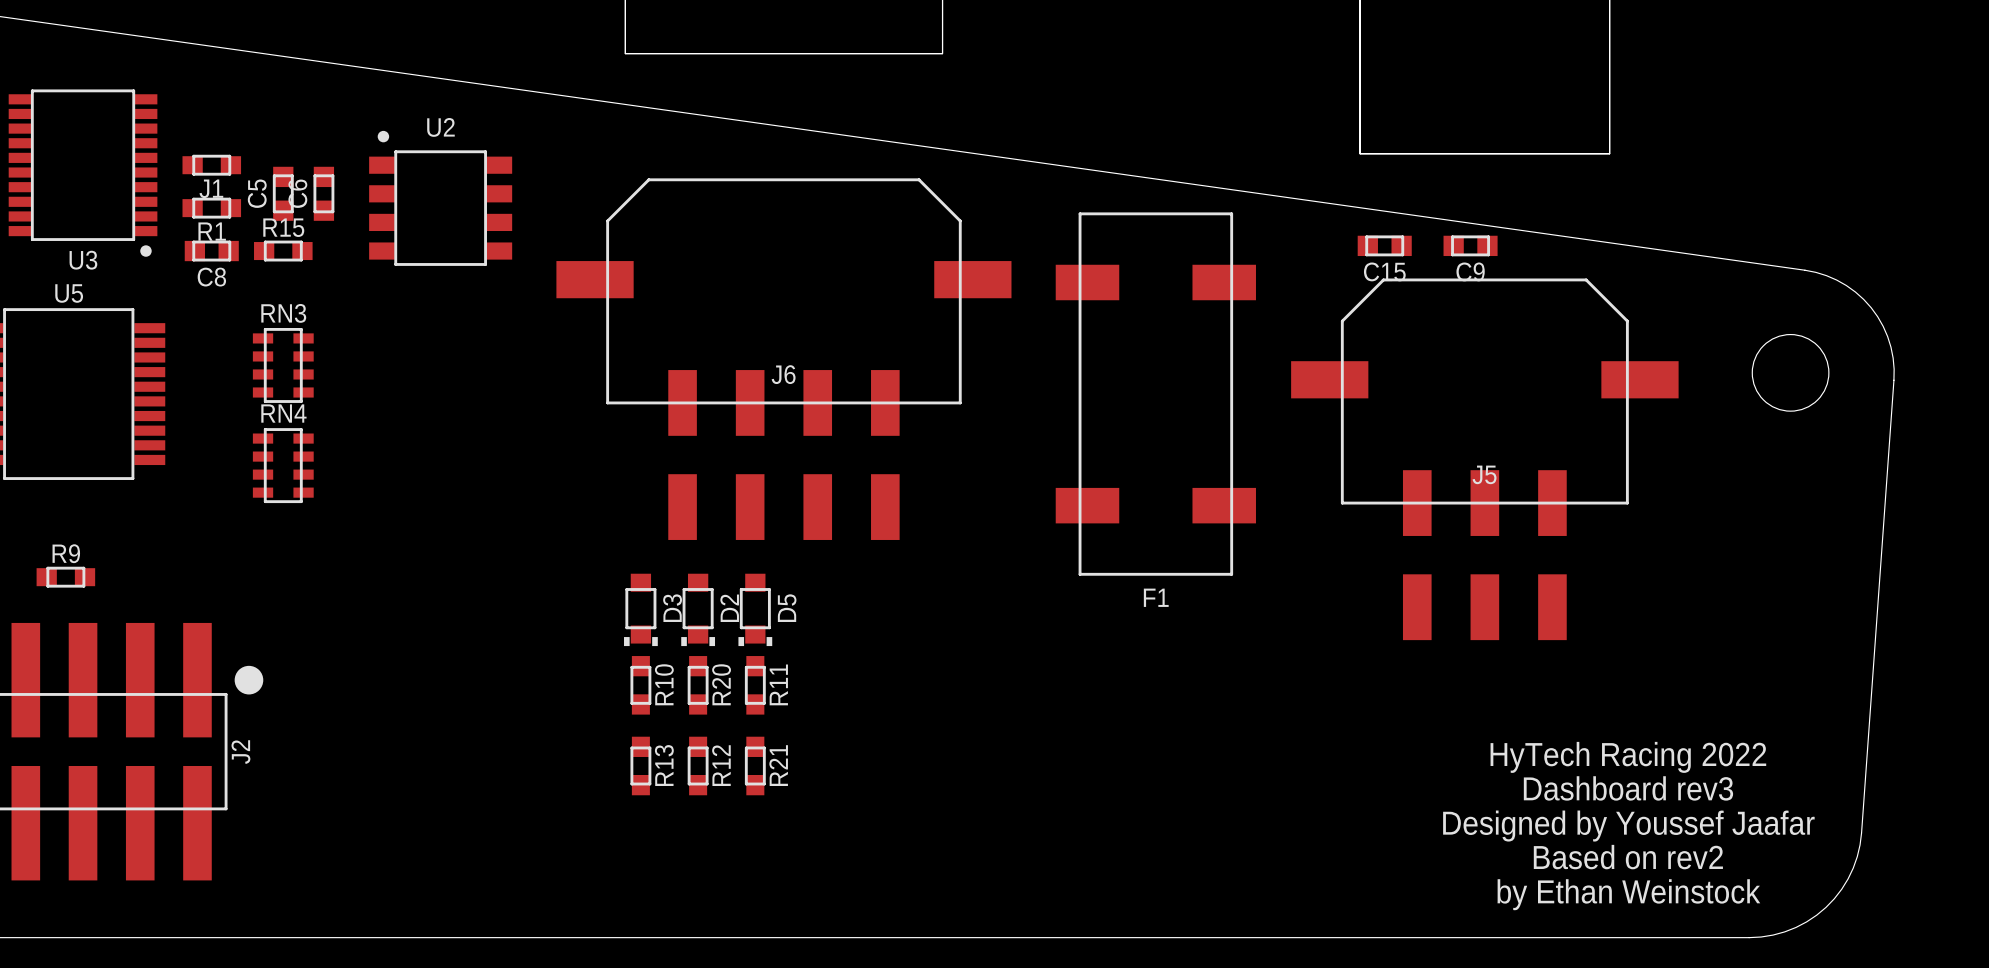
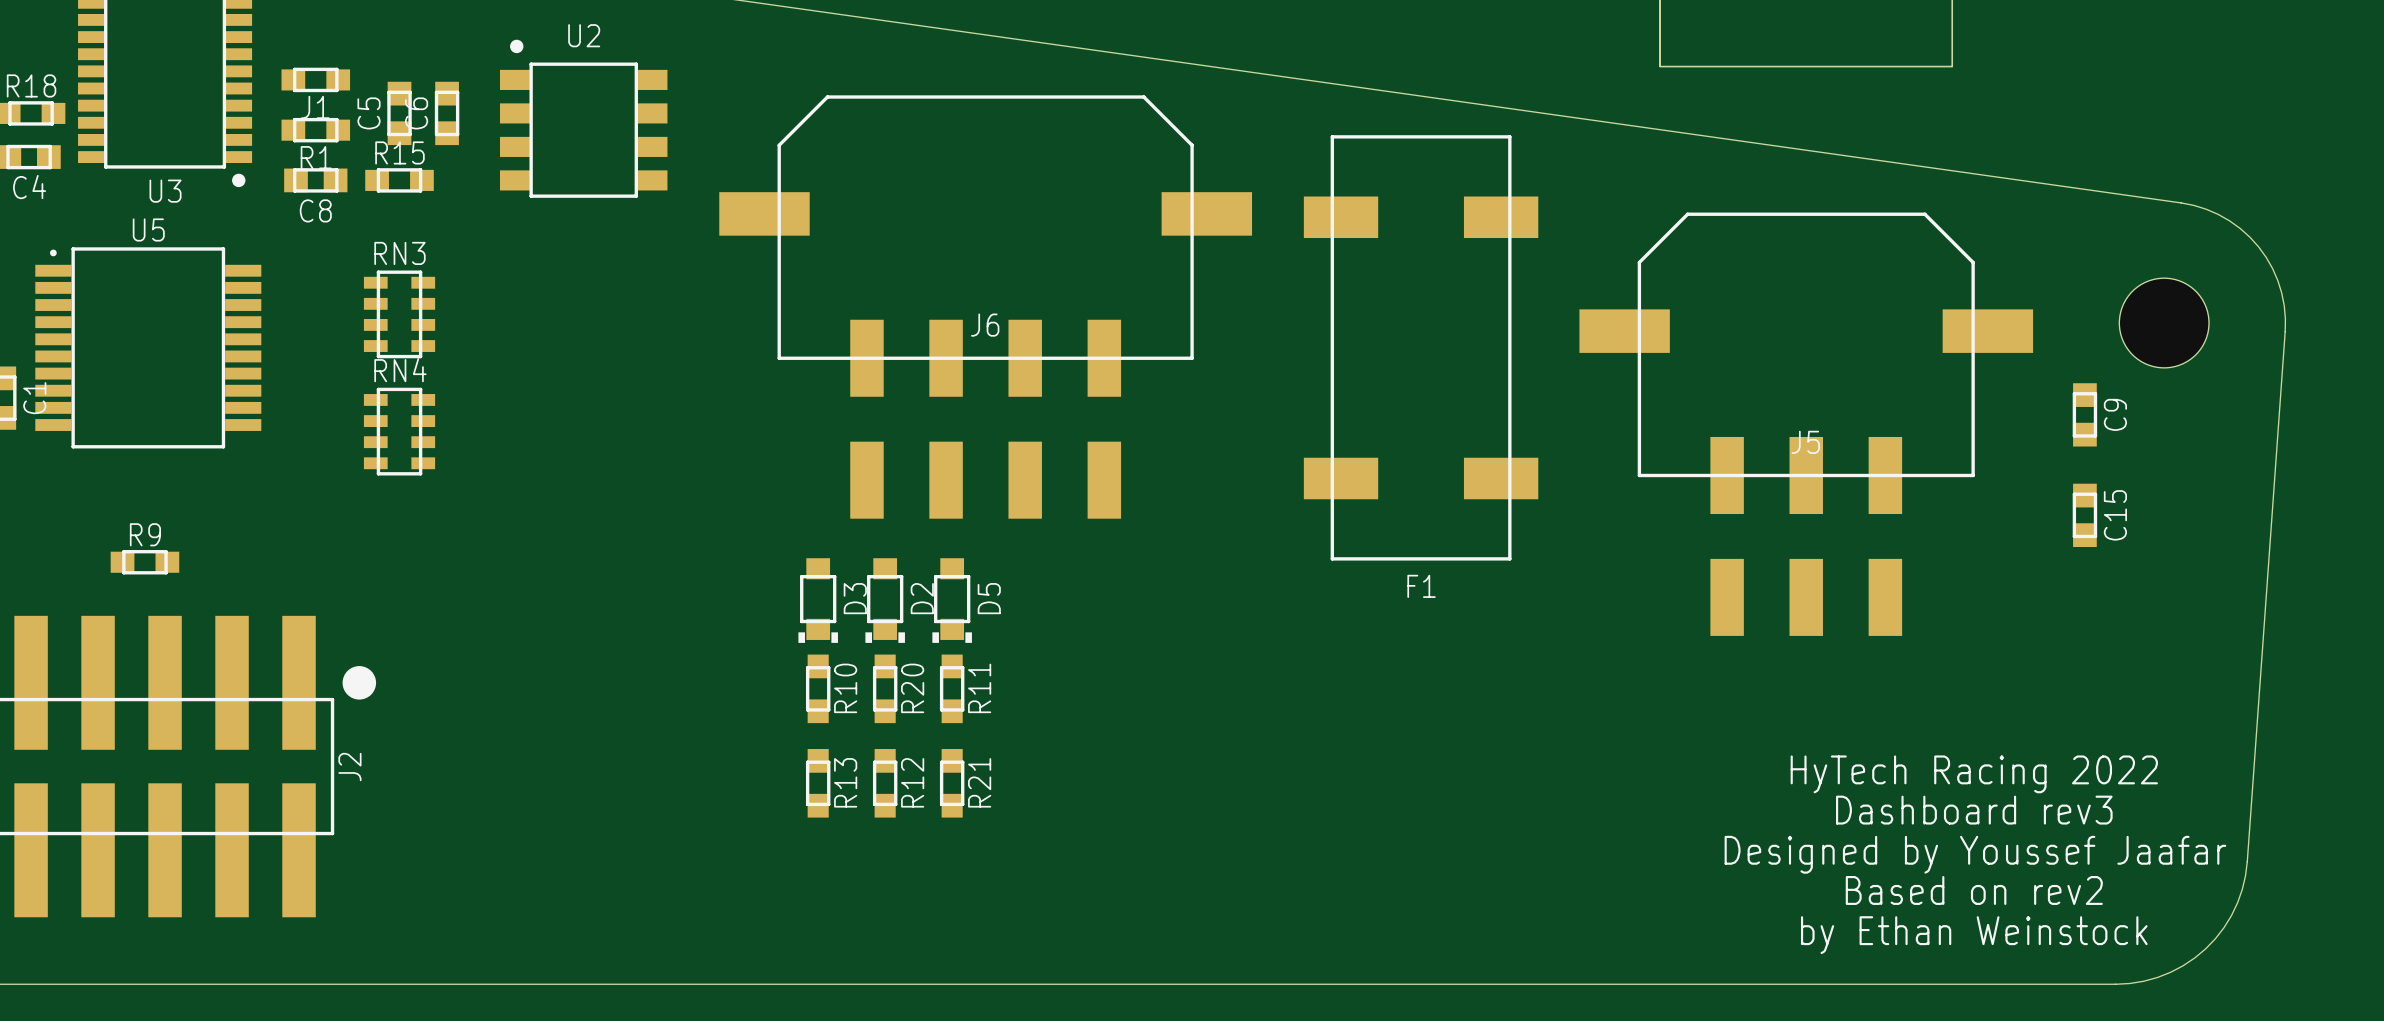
C15 rotation: 0° (1384, 245) -> 90° clockwise (2084, 515)
C15 position: (1384, 245) -> (2084, 515)
C9 rotation: 0° (1470, 245) -> 90° clockwise (2084, 414)
C9 position: (1470, 245) -> (2084, 414)

